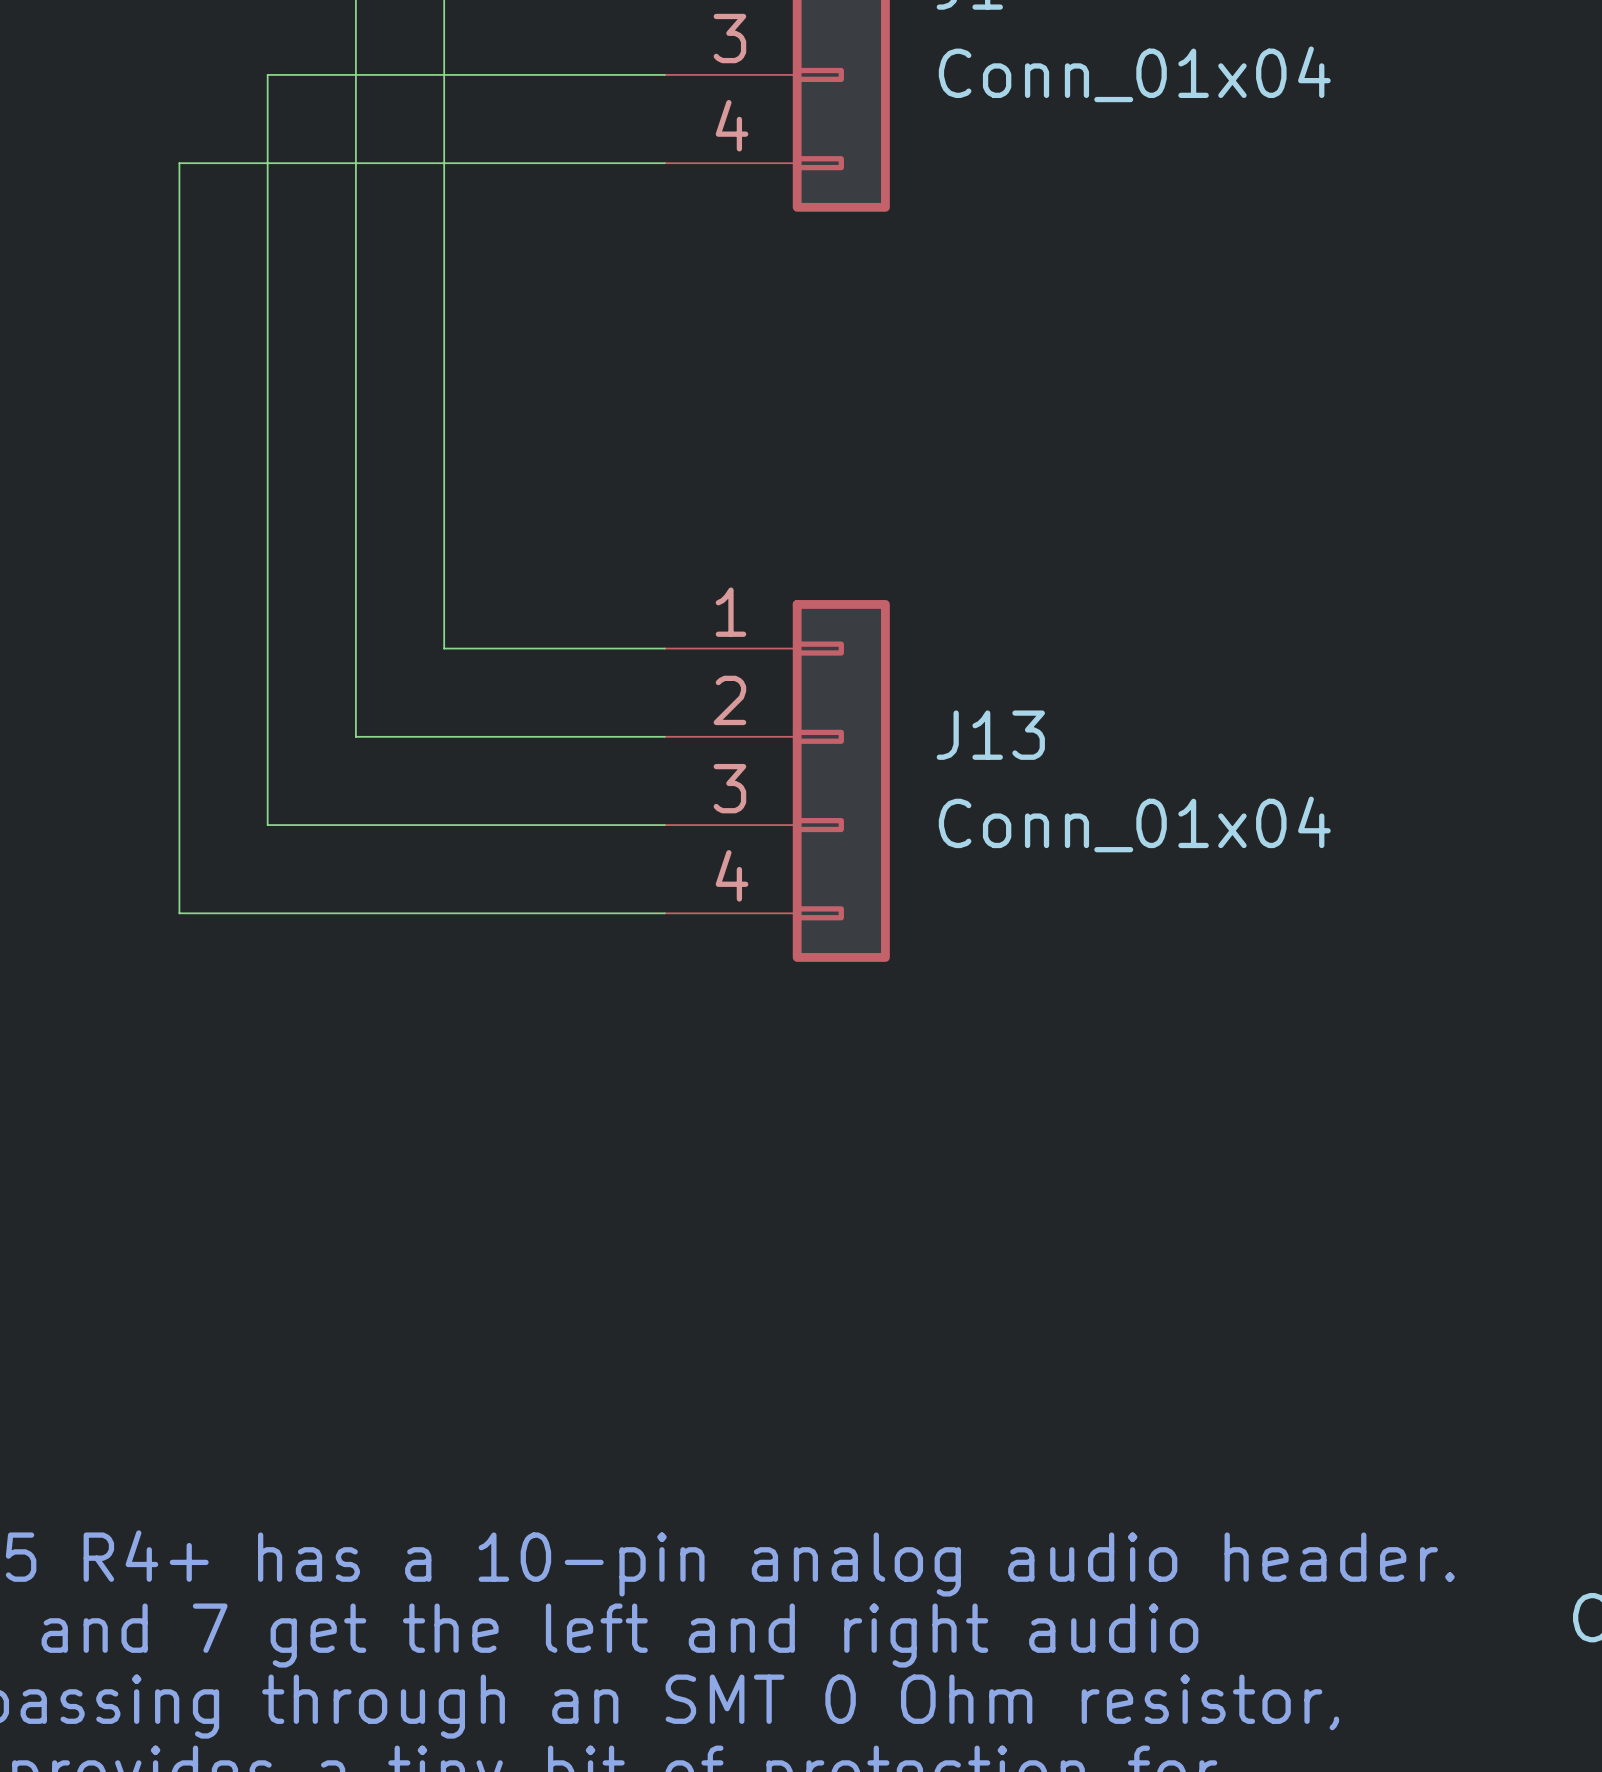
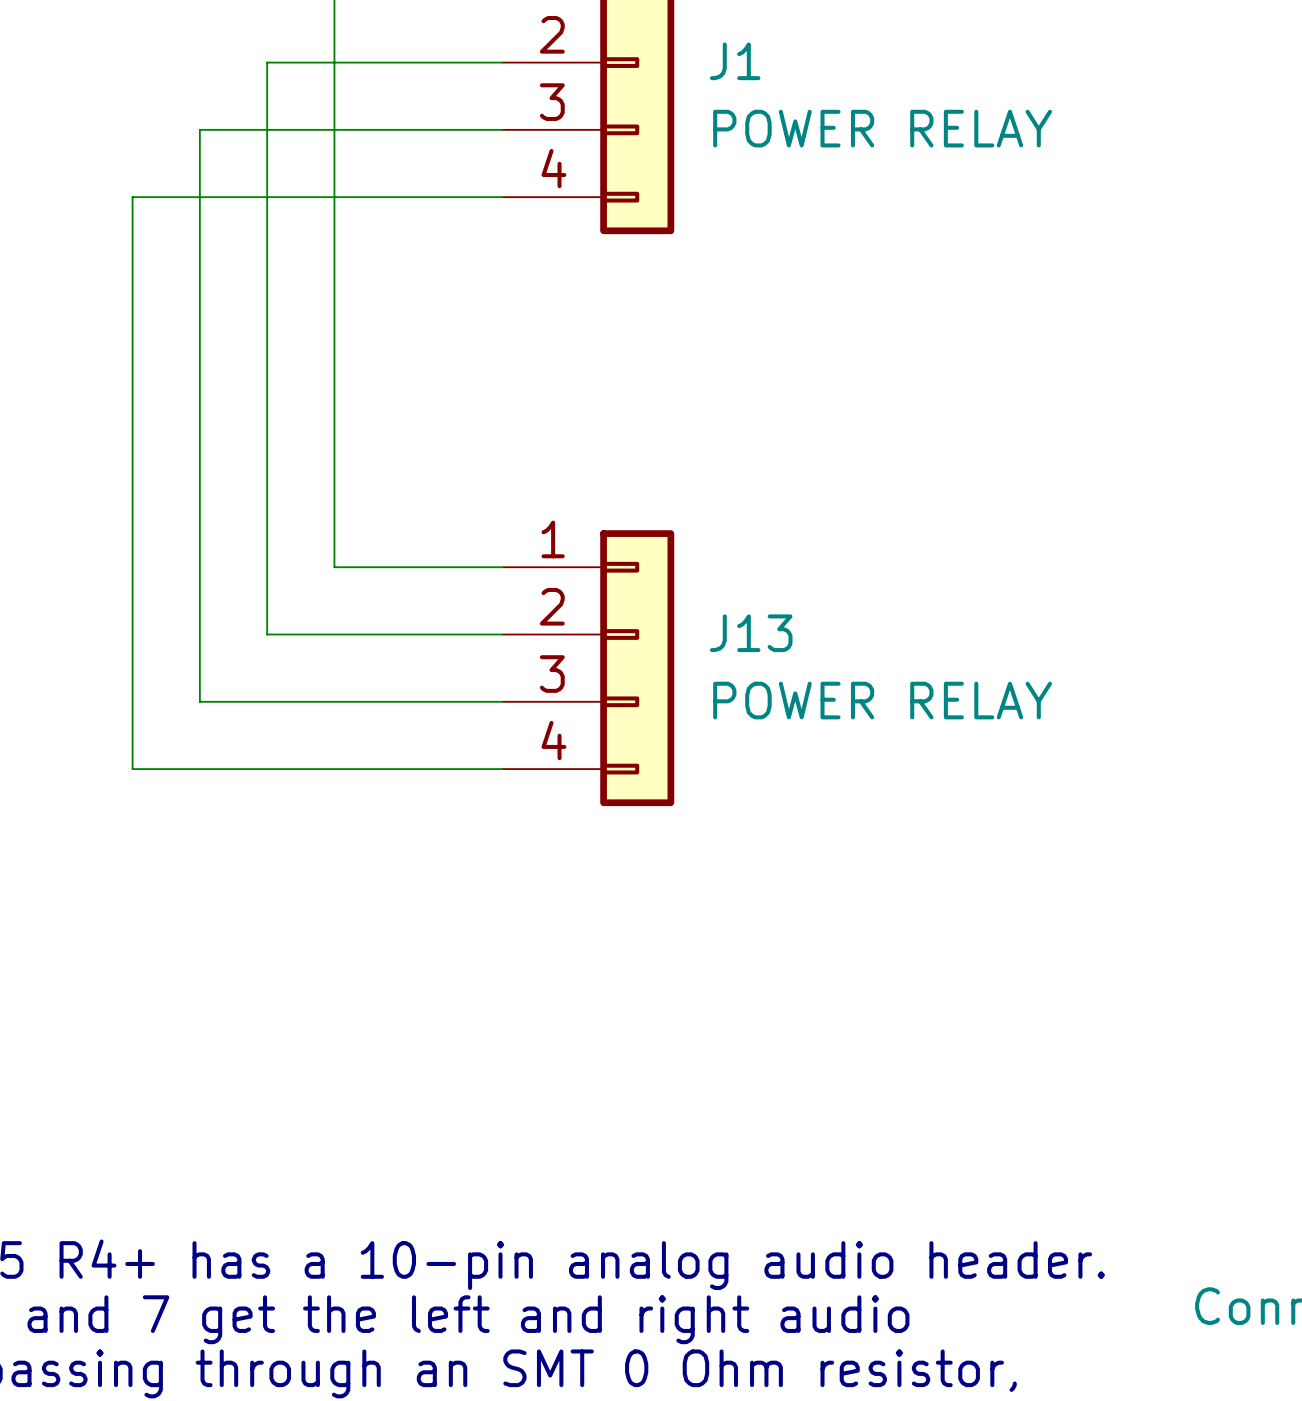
J1 value: Conn_01x04 (1134, 74) -> POWER RELAY (882, 128)
J13 value: Conn_01x04 (1134, 824) -> POWER RELAY (882, 700)

